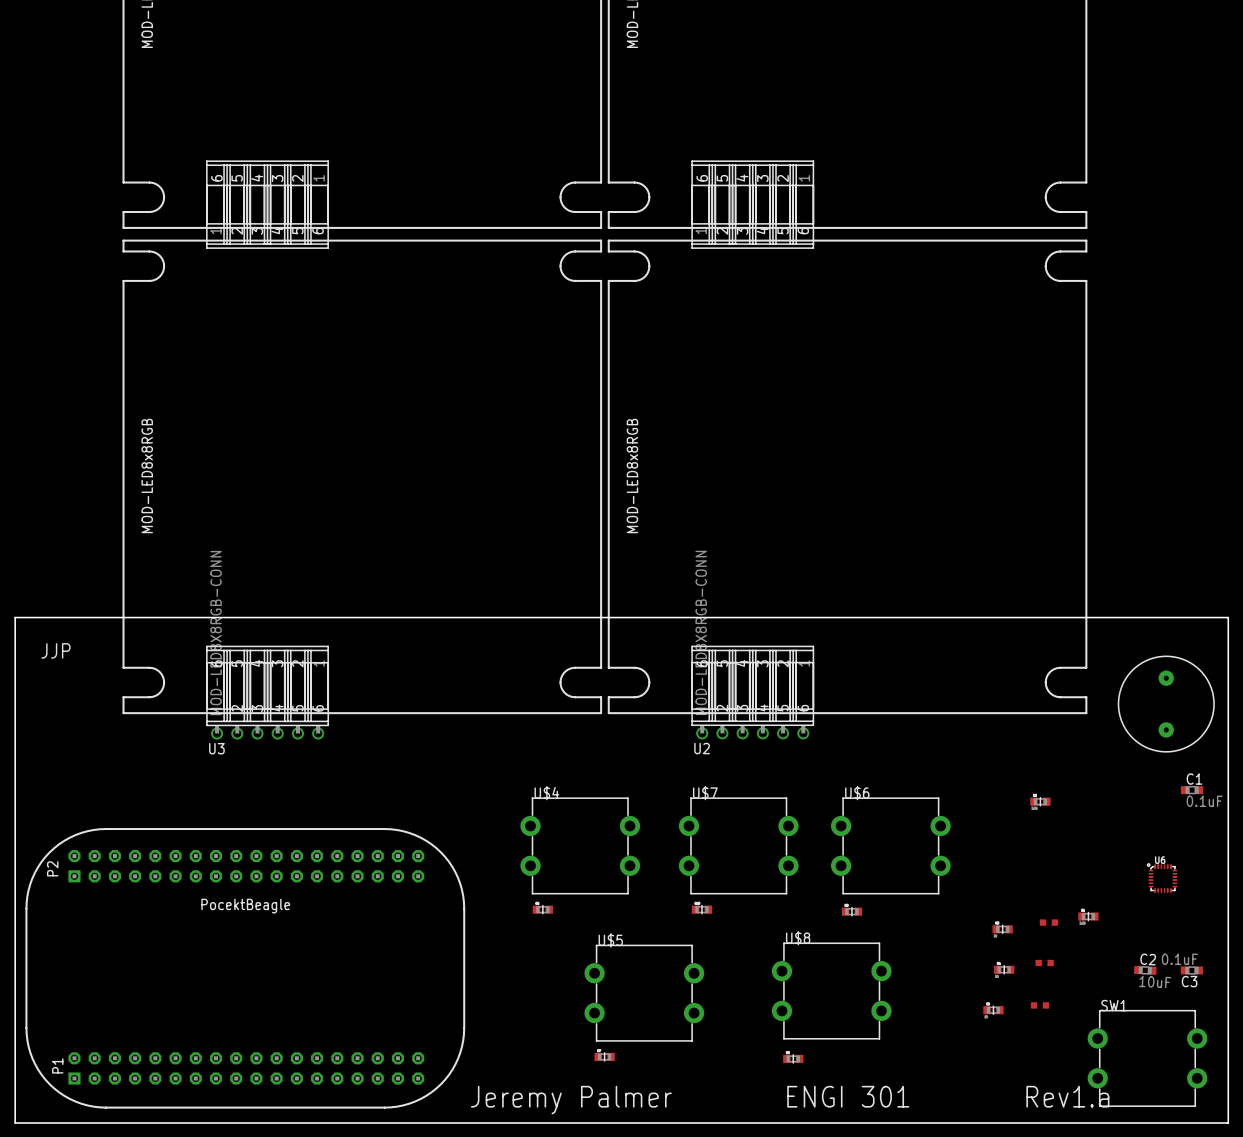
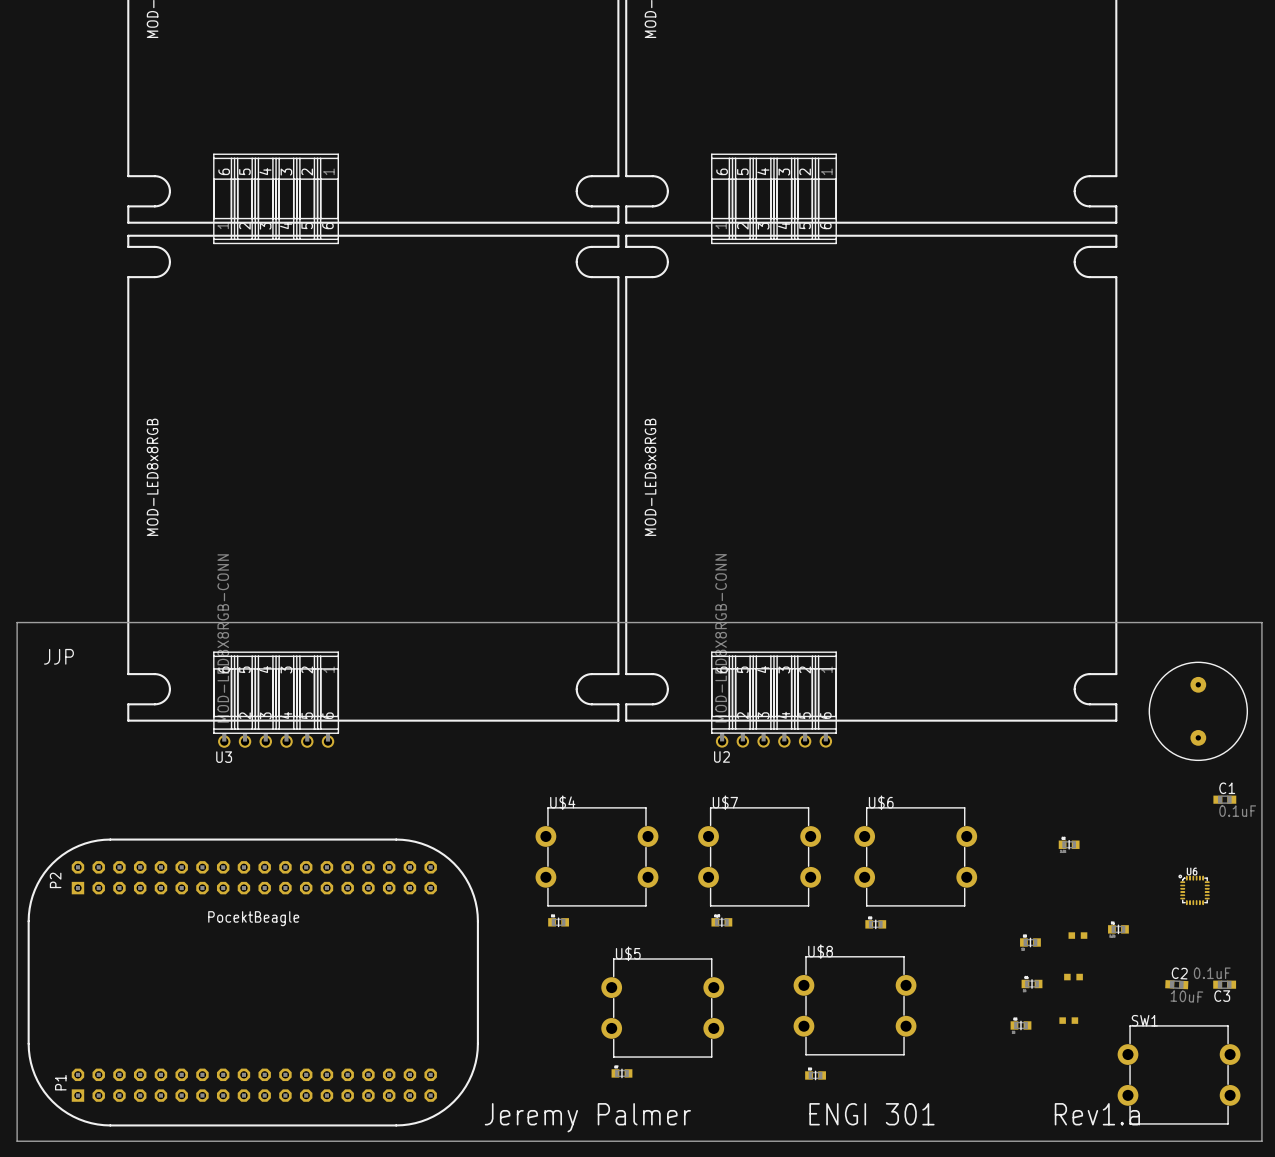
part position: (1040, 801) -> (1069, 844)

